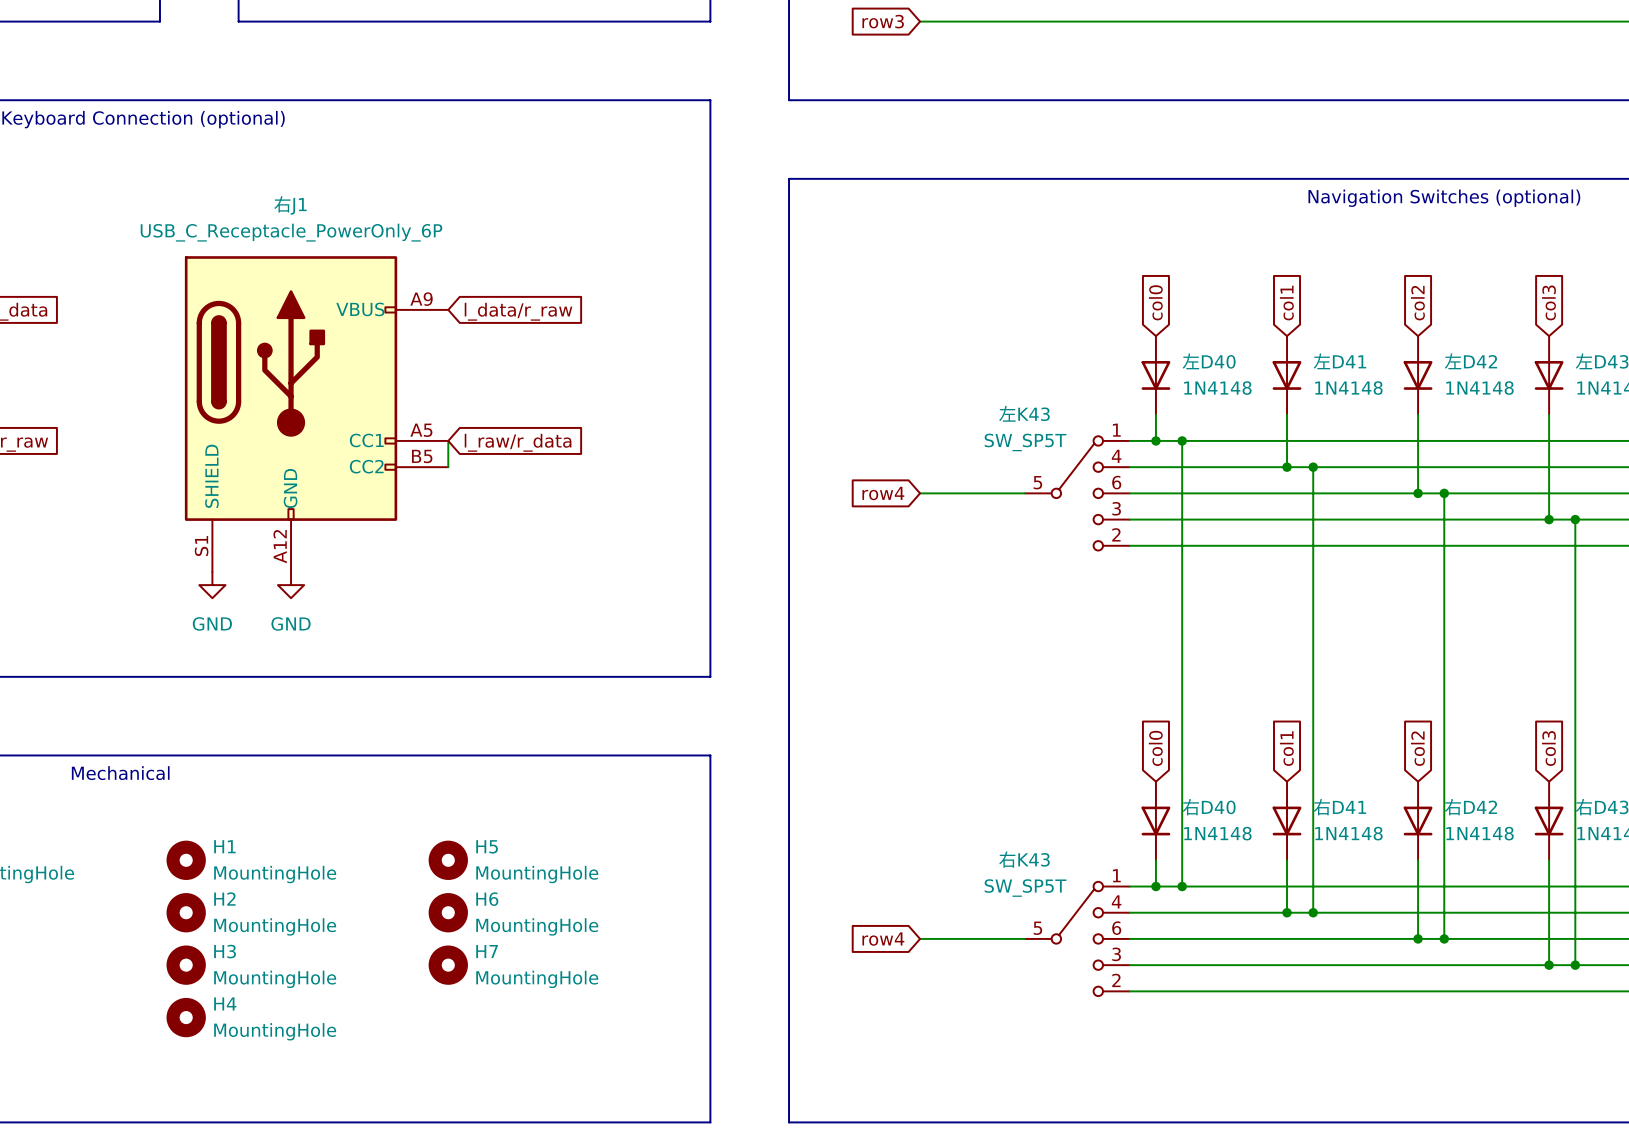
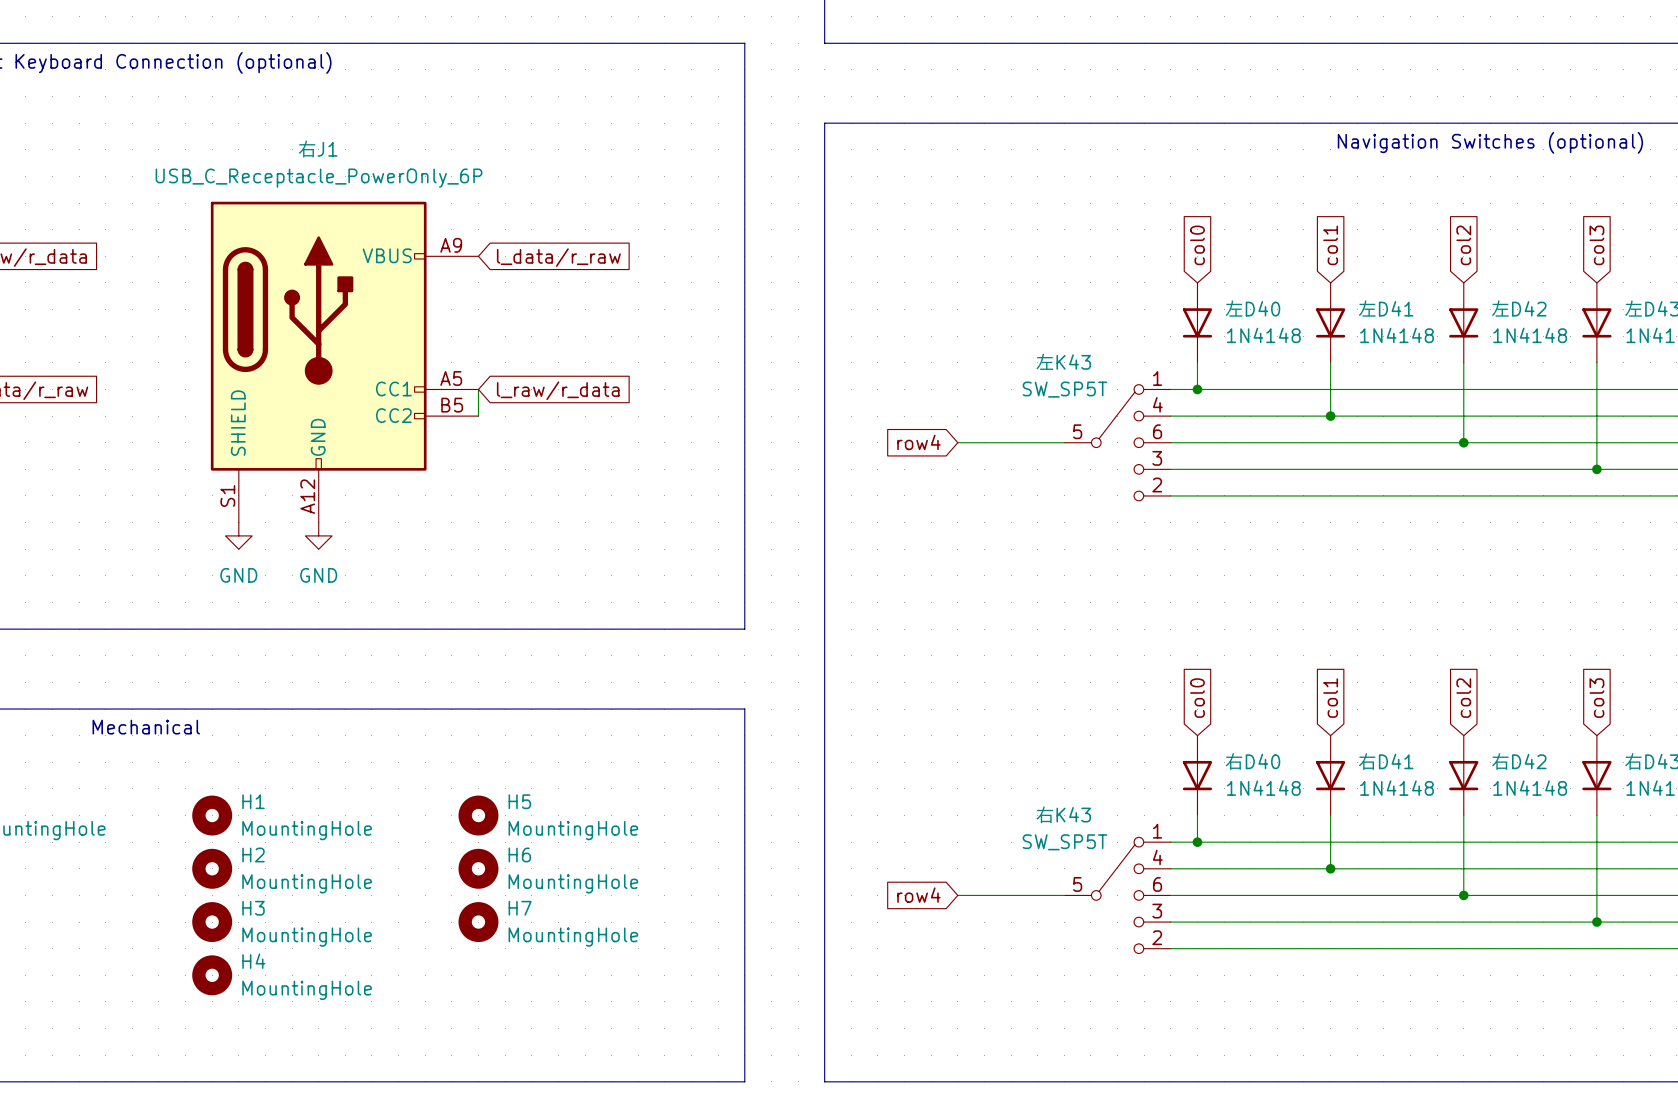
wire: (1182, 440) (1182, 886) -> none
junction: (1182, 440) -> none
wire: (1313, 467) (1313, 912) -> none
junction: (1313, 467) -> none
wire: (1444, 493) (1444, 938) -> none
junction: (1444, 493) -> none
wire: (1575, 519) (1575, 965) -> none
junction: (1575, 519) -> none
junction: (1182, 886) -> none
junction: (1313, 912) -> none
junction: (1444, 938) -> none
junction: (1575, 965) -> none

